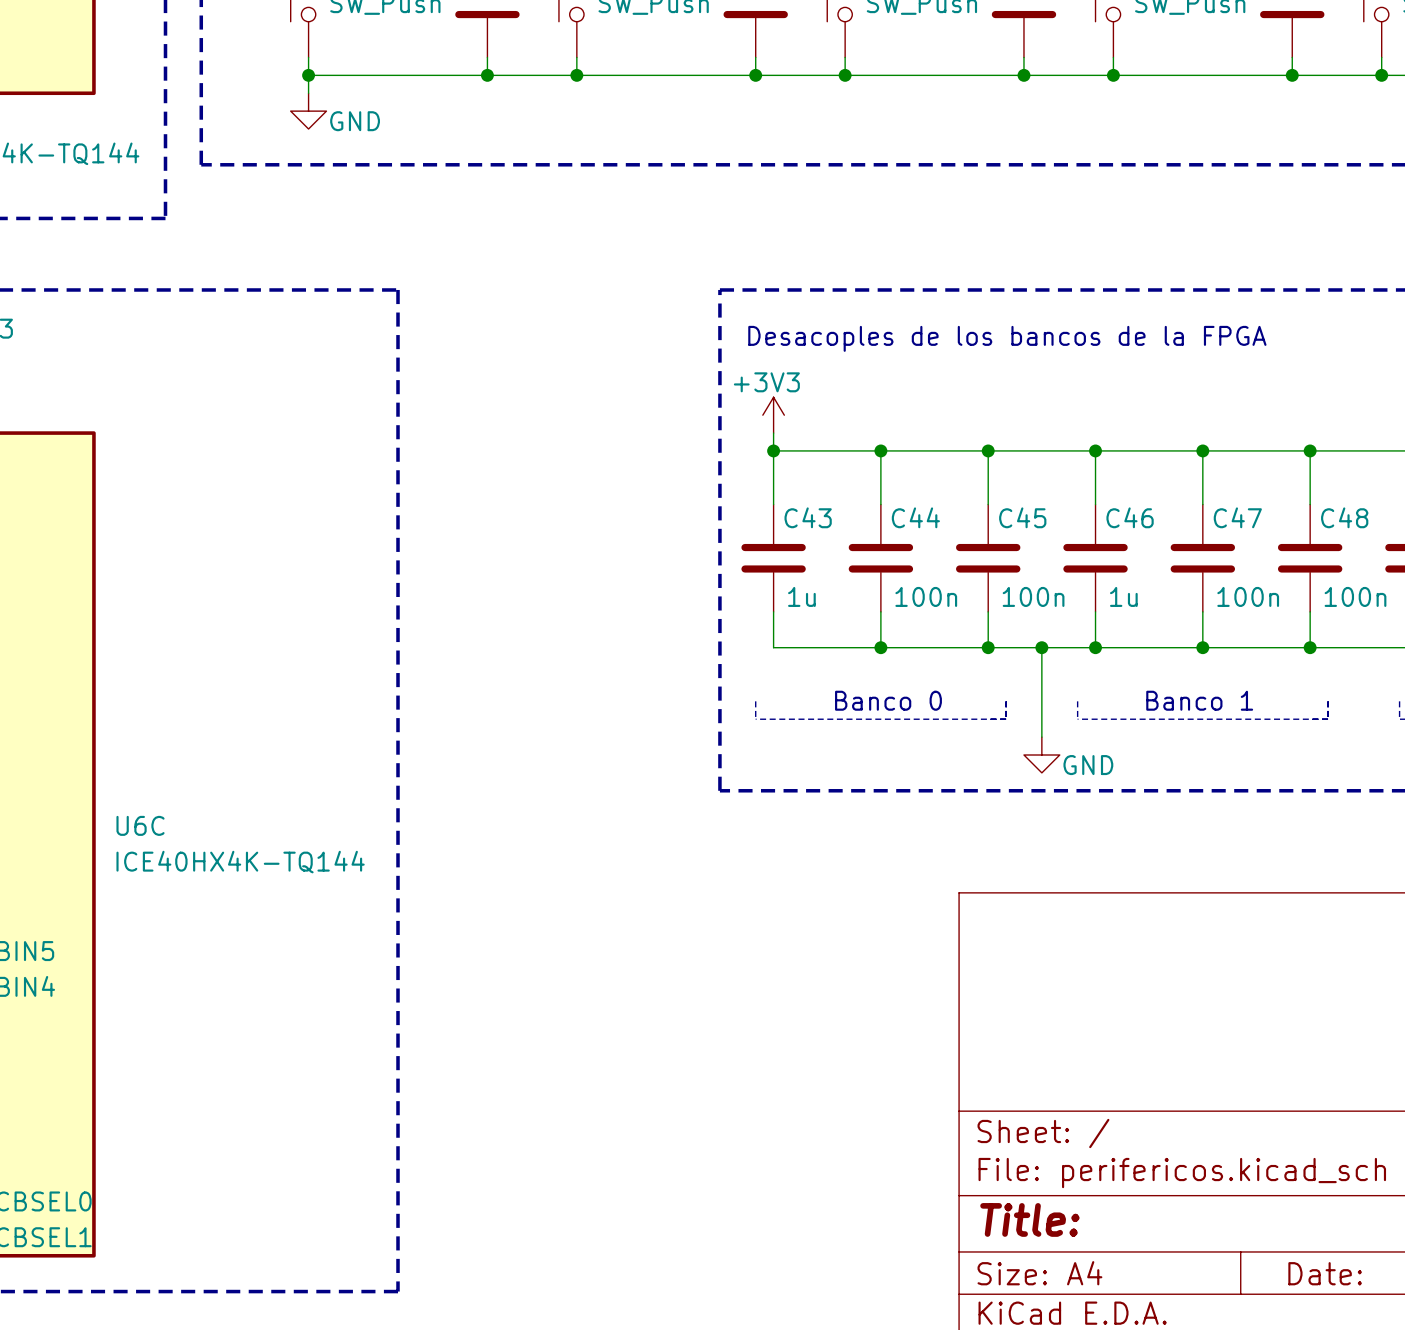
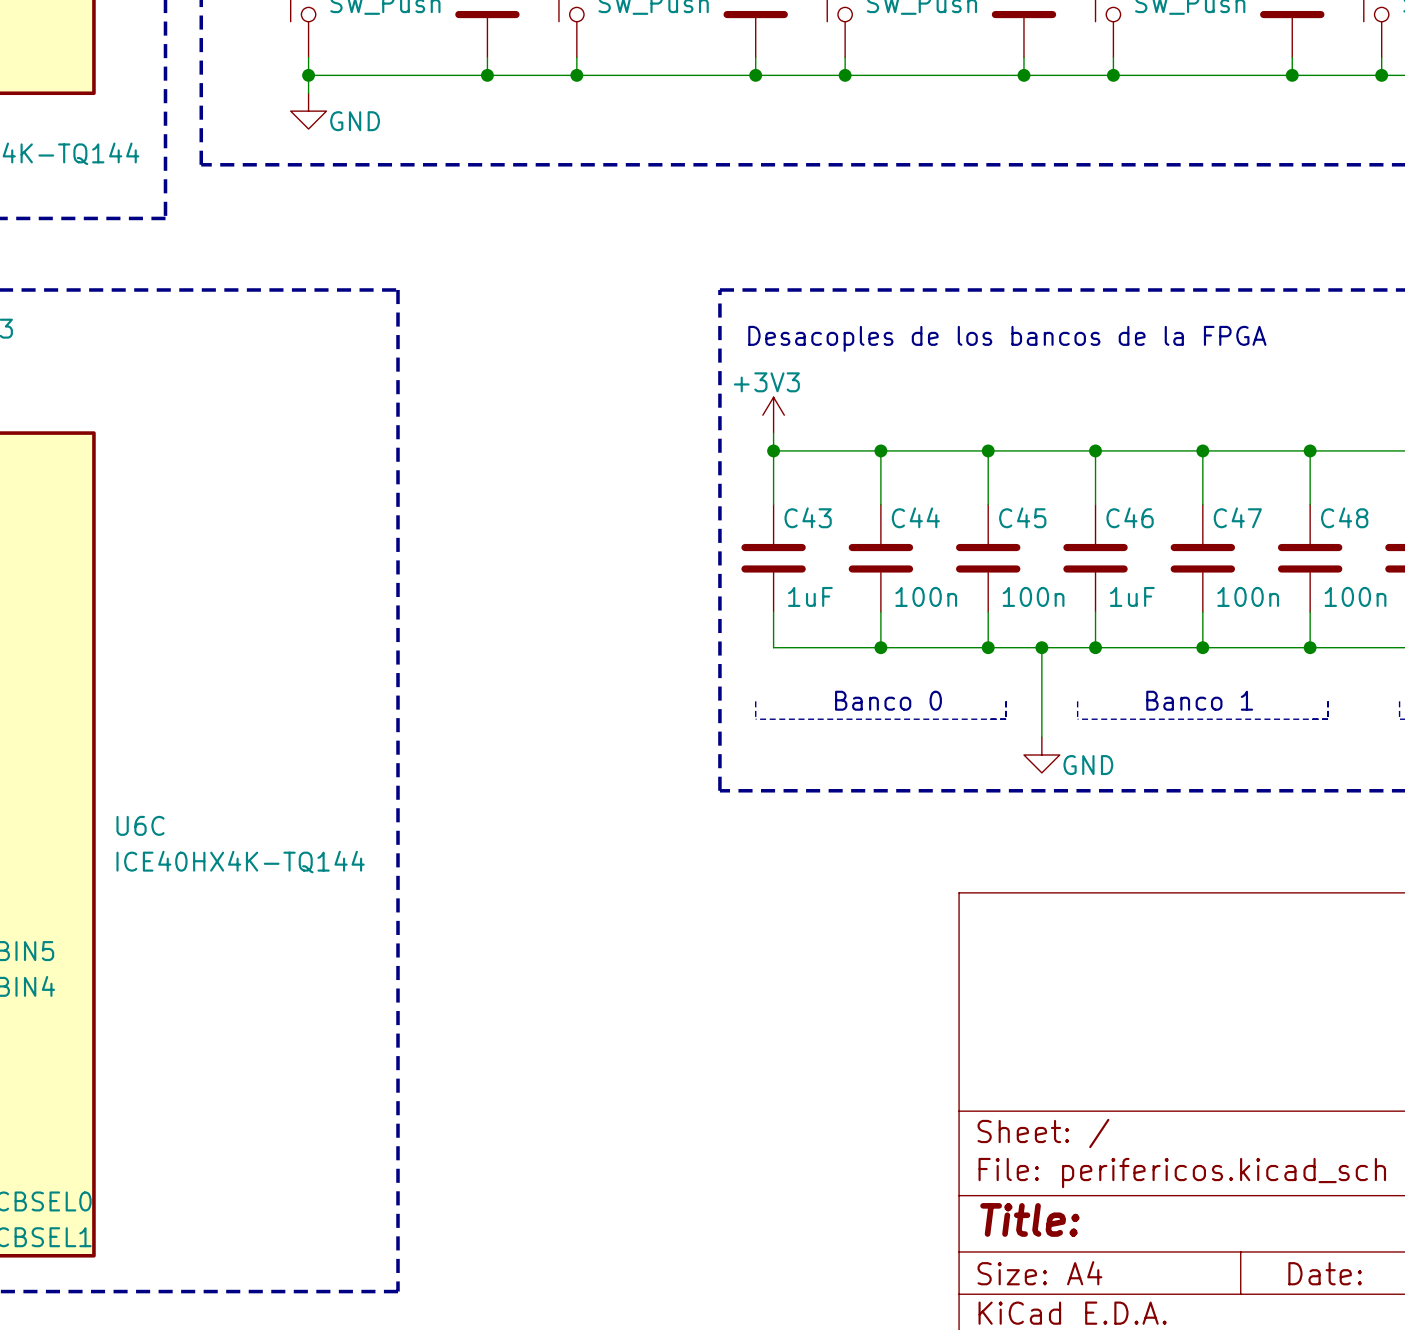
C43 value: 1u (801, 596) -> 1uF (810, 596)
C46 value: 1u (1123, 596) -> 1uF (1132, 596)

